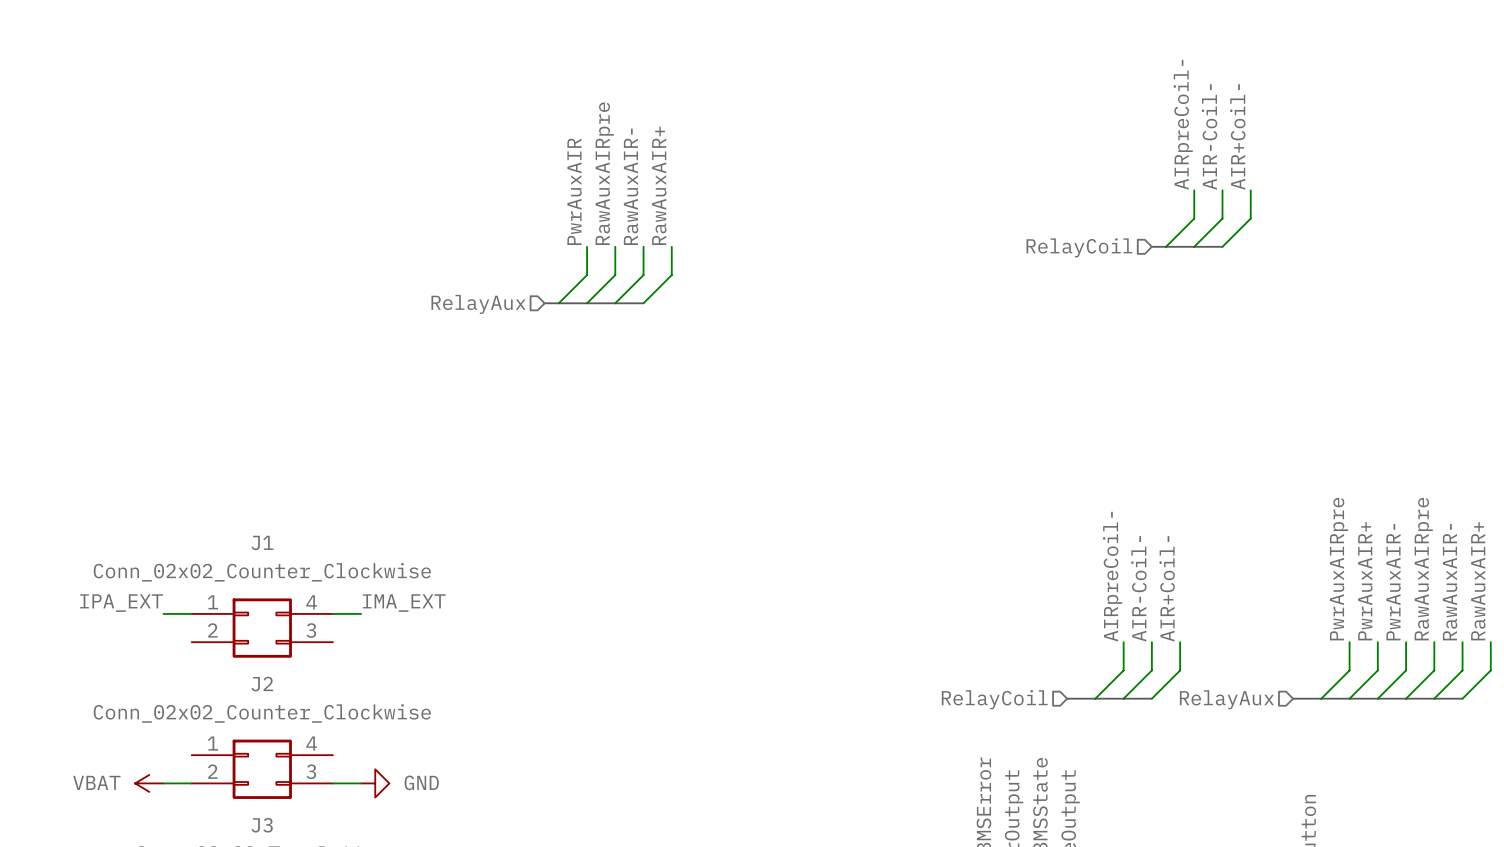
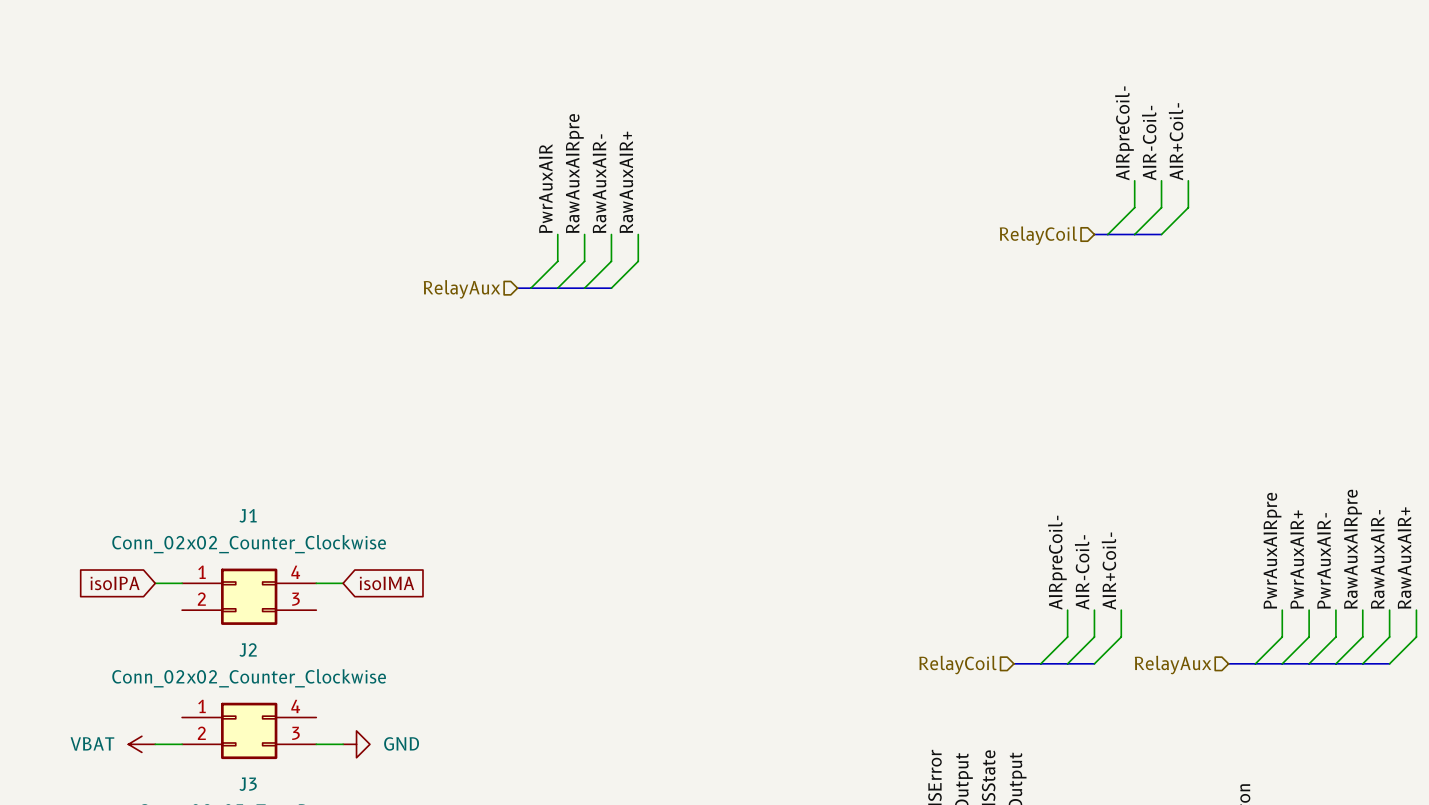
label: IPA_EXT (121, 603) -> none
label: IMA_EXT (404, 603) -> none
global label: none -> isoIPA (115, 583)
global label: none -> isoIMA (387, 583)

